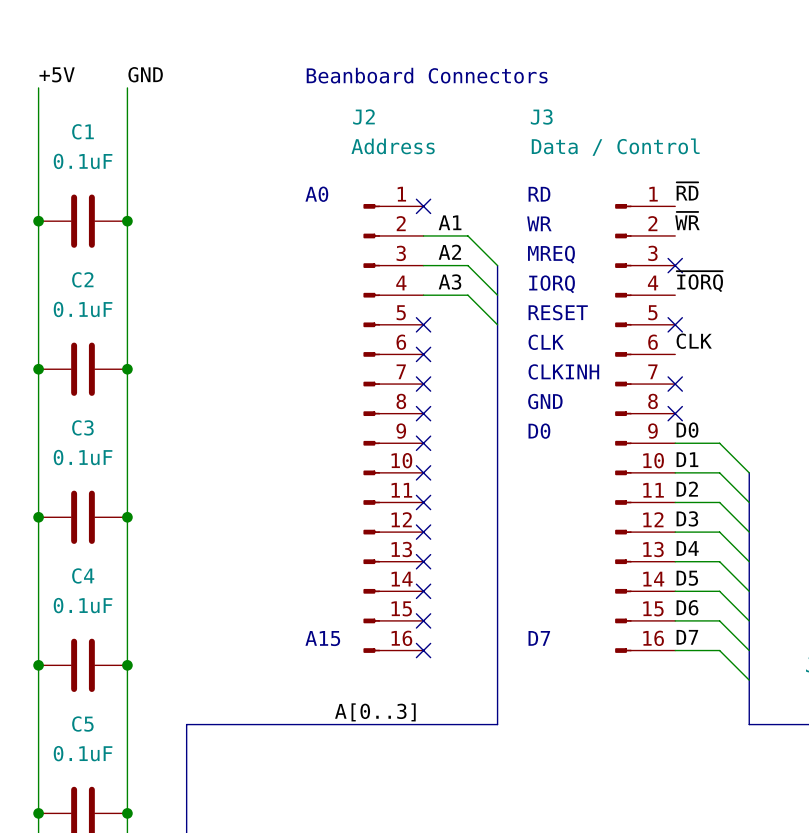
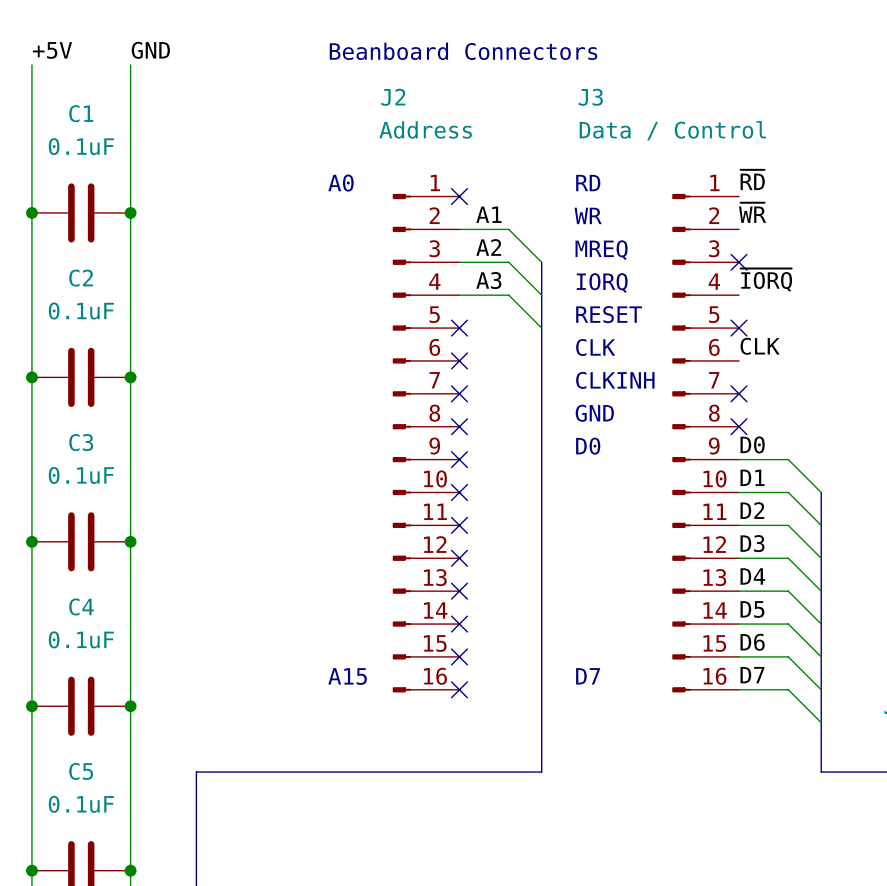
label: A[0..3] (375, 712) -> none

